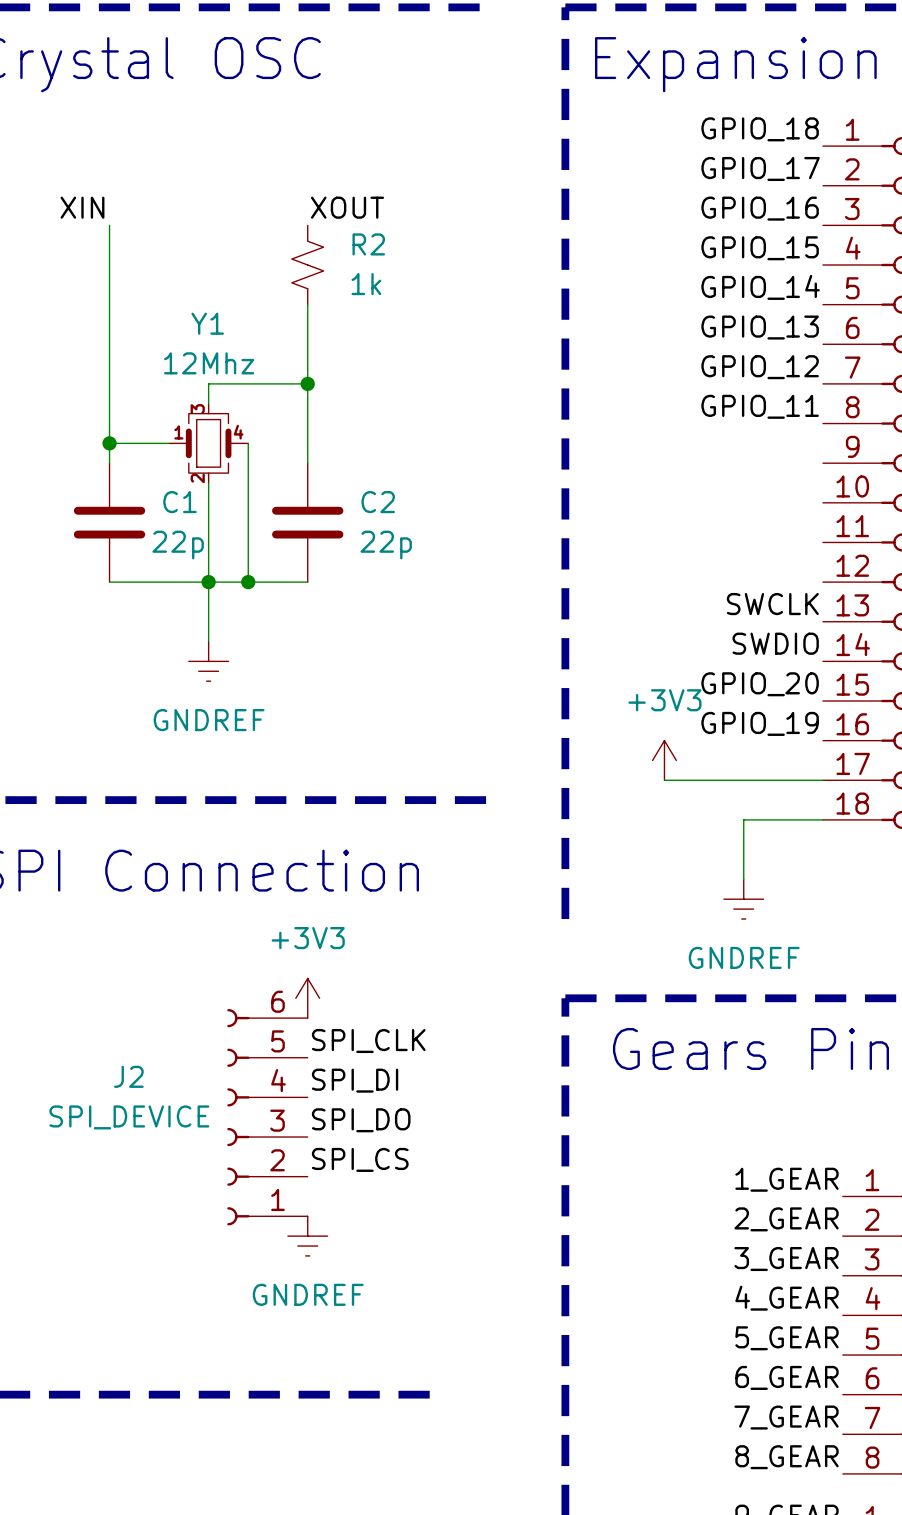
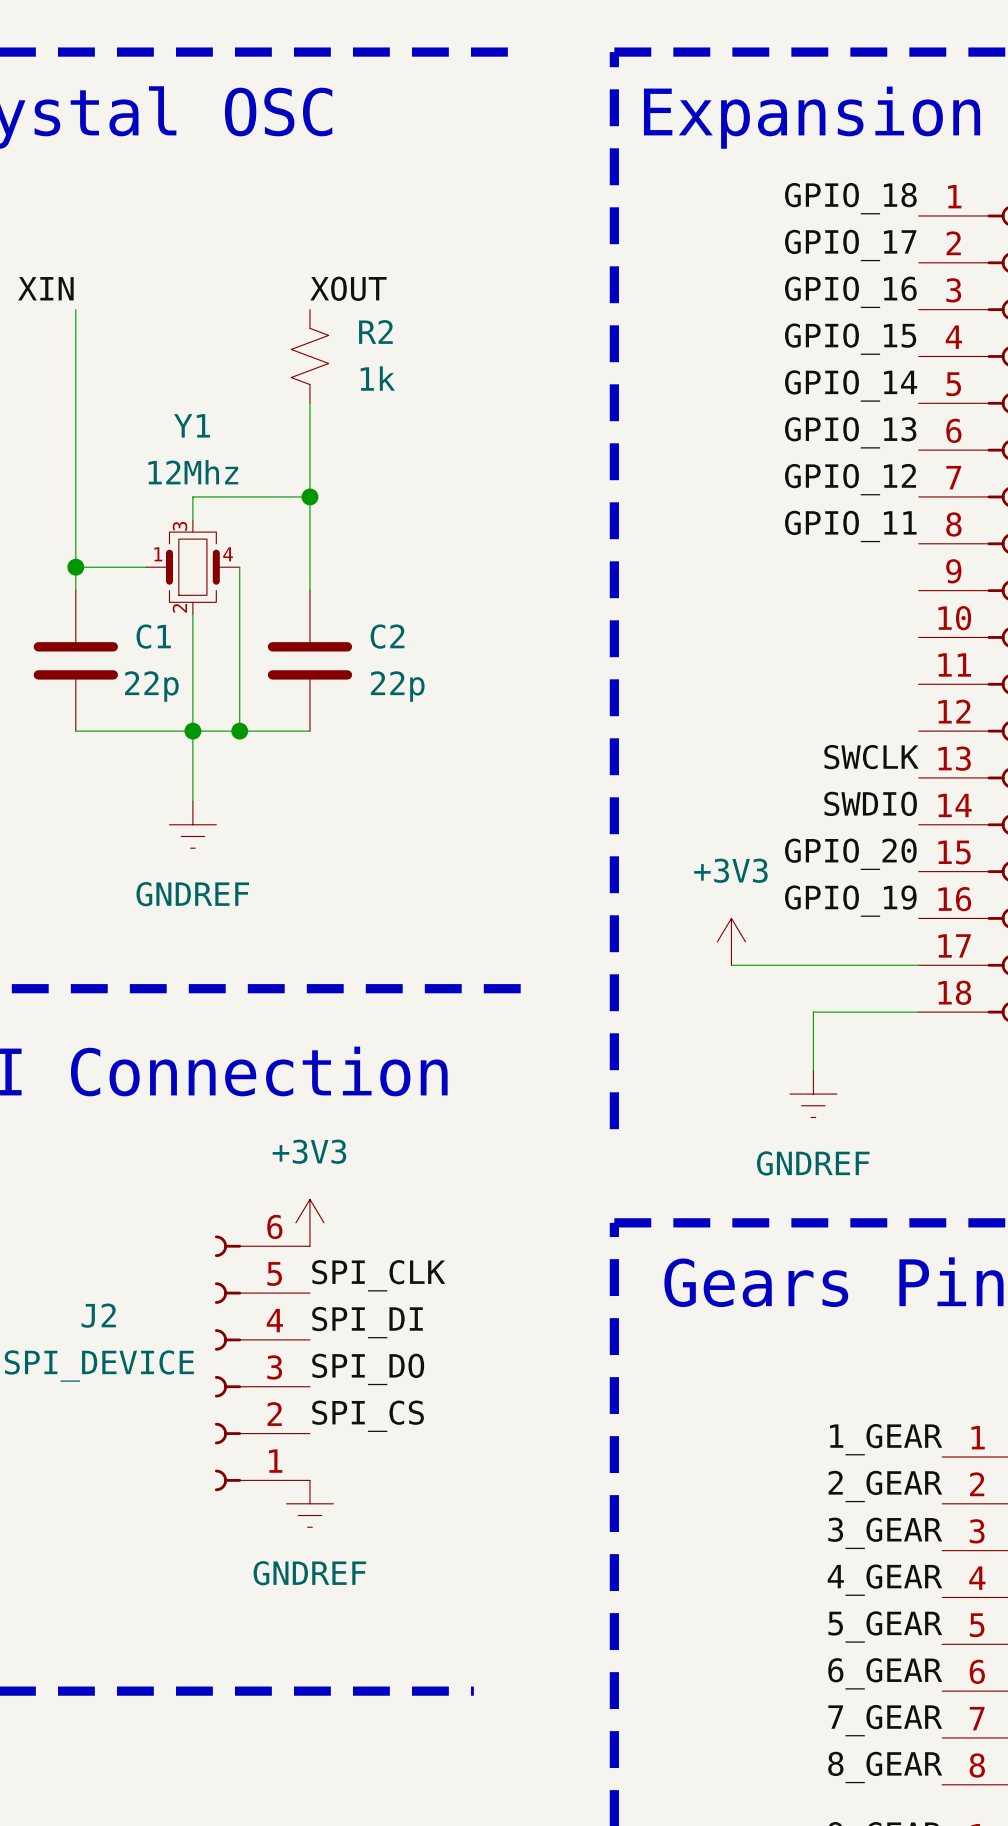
wire: (743, 819) (743, 879) -> (825, 1012) (813, 1012) (813, 1070)
power symbol position: GNDREF (743, 899) -> GNDREF (813, 1094)

